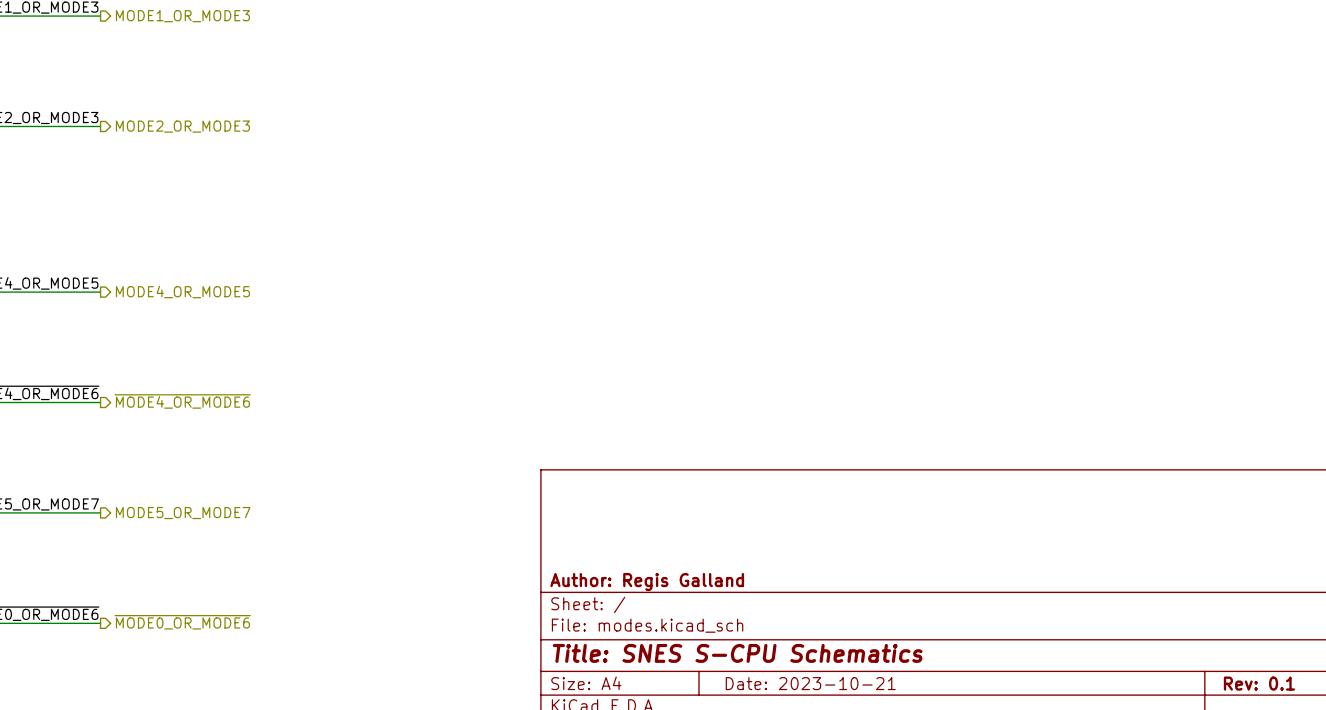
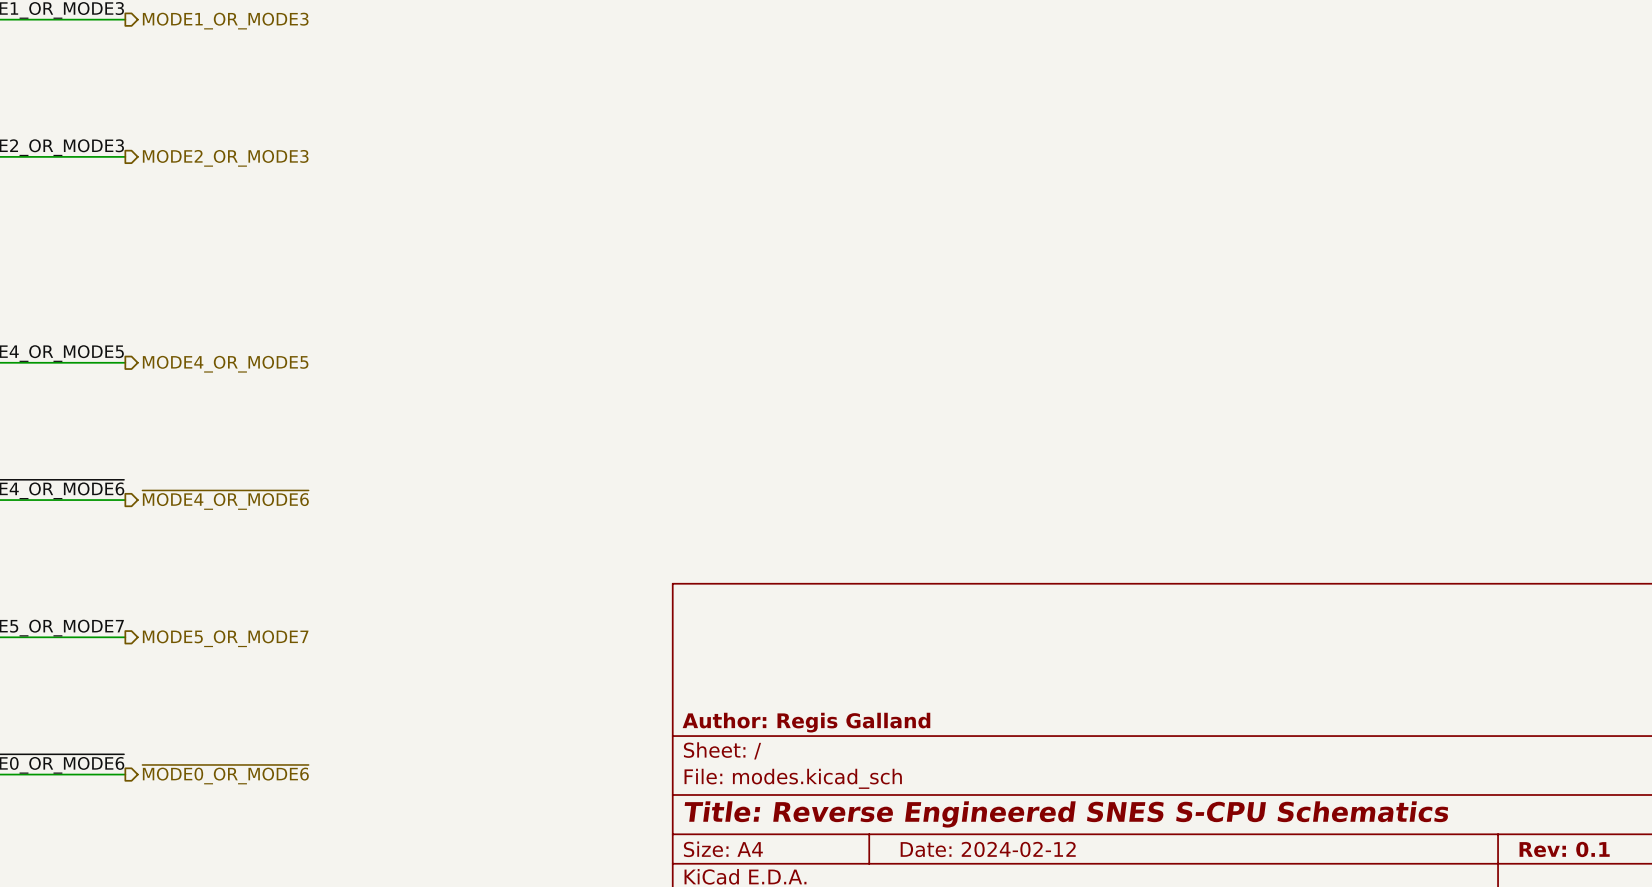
title block: Title: SNES S-CPU Schematics (737, 653) -> Title: Reverse Engineered SNES S-CPU Schematics (1066, 814)
title block: Date: 2023-10-21 (810, 683) -> Date: 2024-02-12 (988, 849)

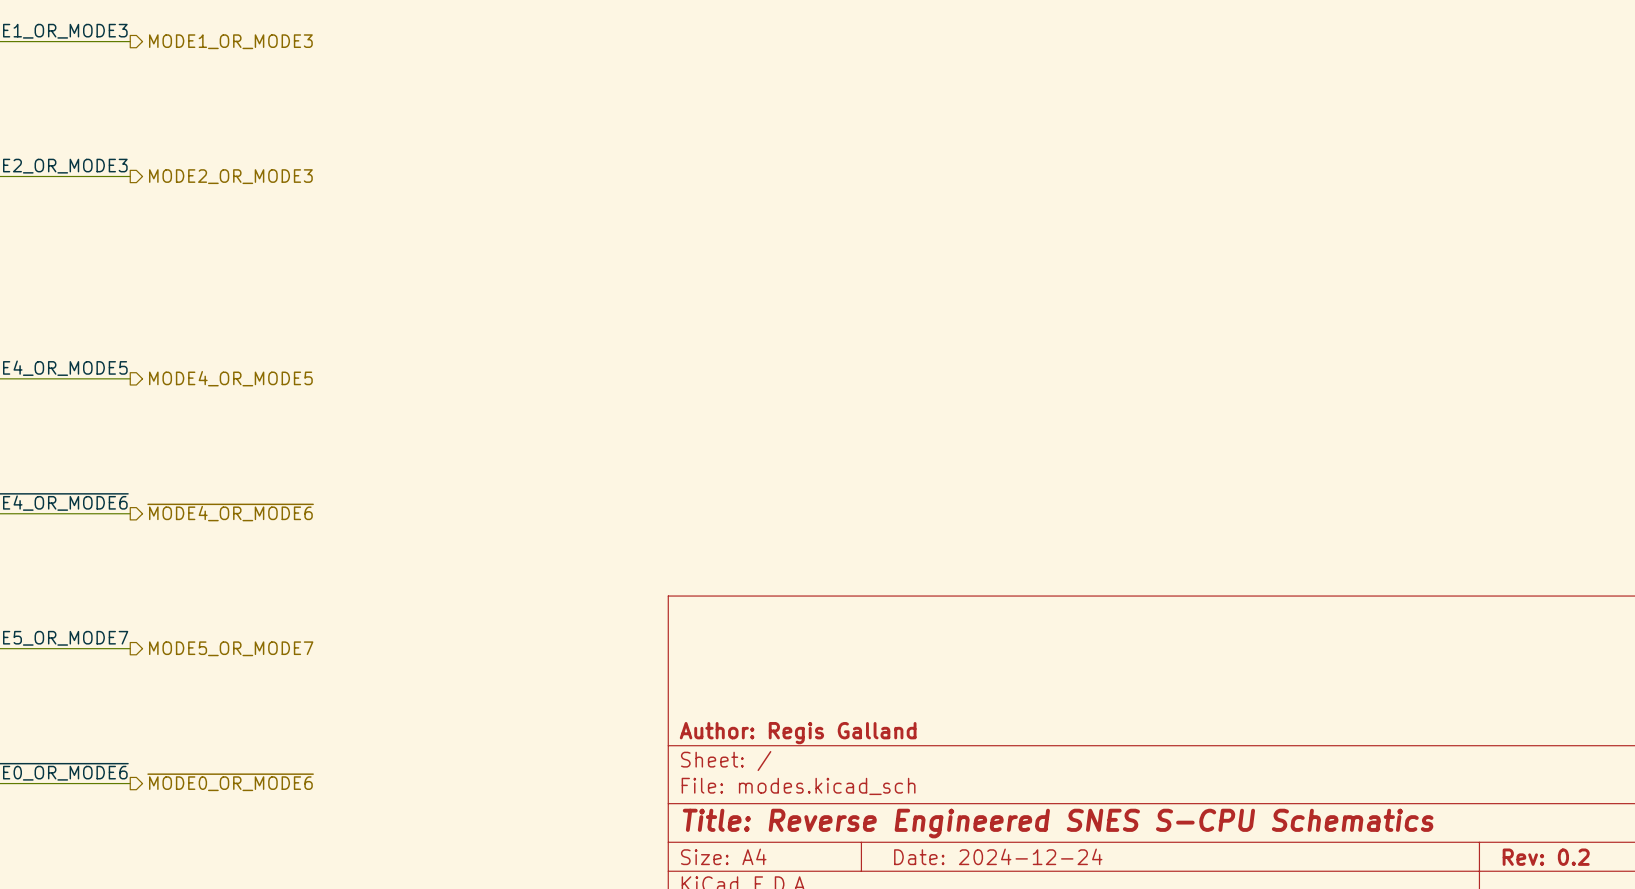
title block: Date: 2024-02-12 (988, 849) -> Date: 2024-12-24 (998, 856)
title block: Rev: 0.1 (1564, 849) -> Rev: 0.2 (1546, 857)

